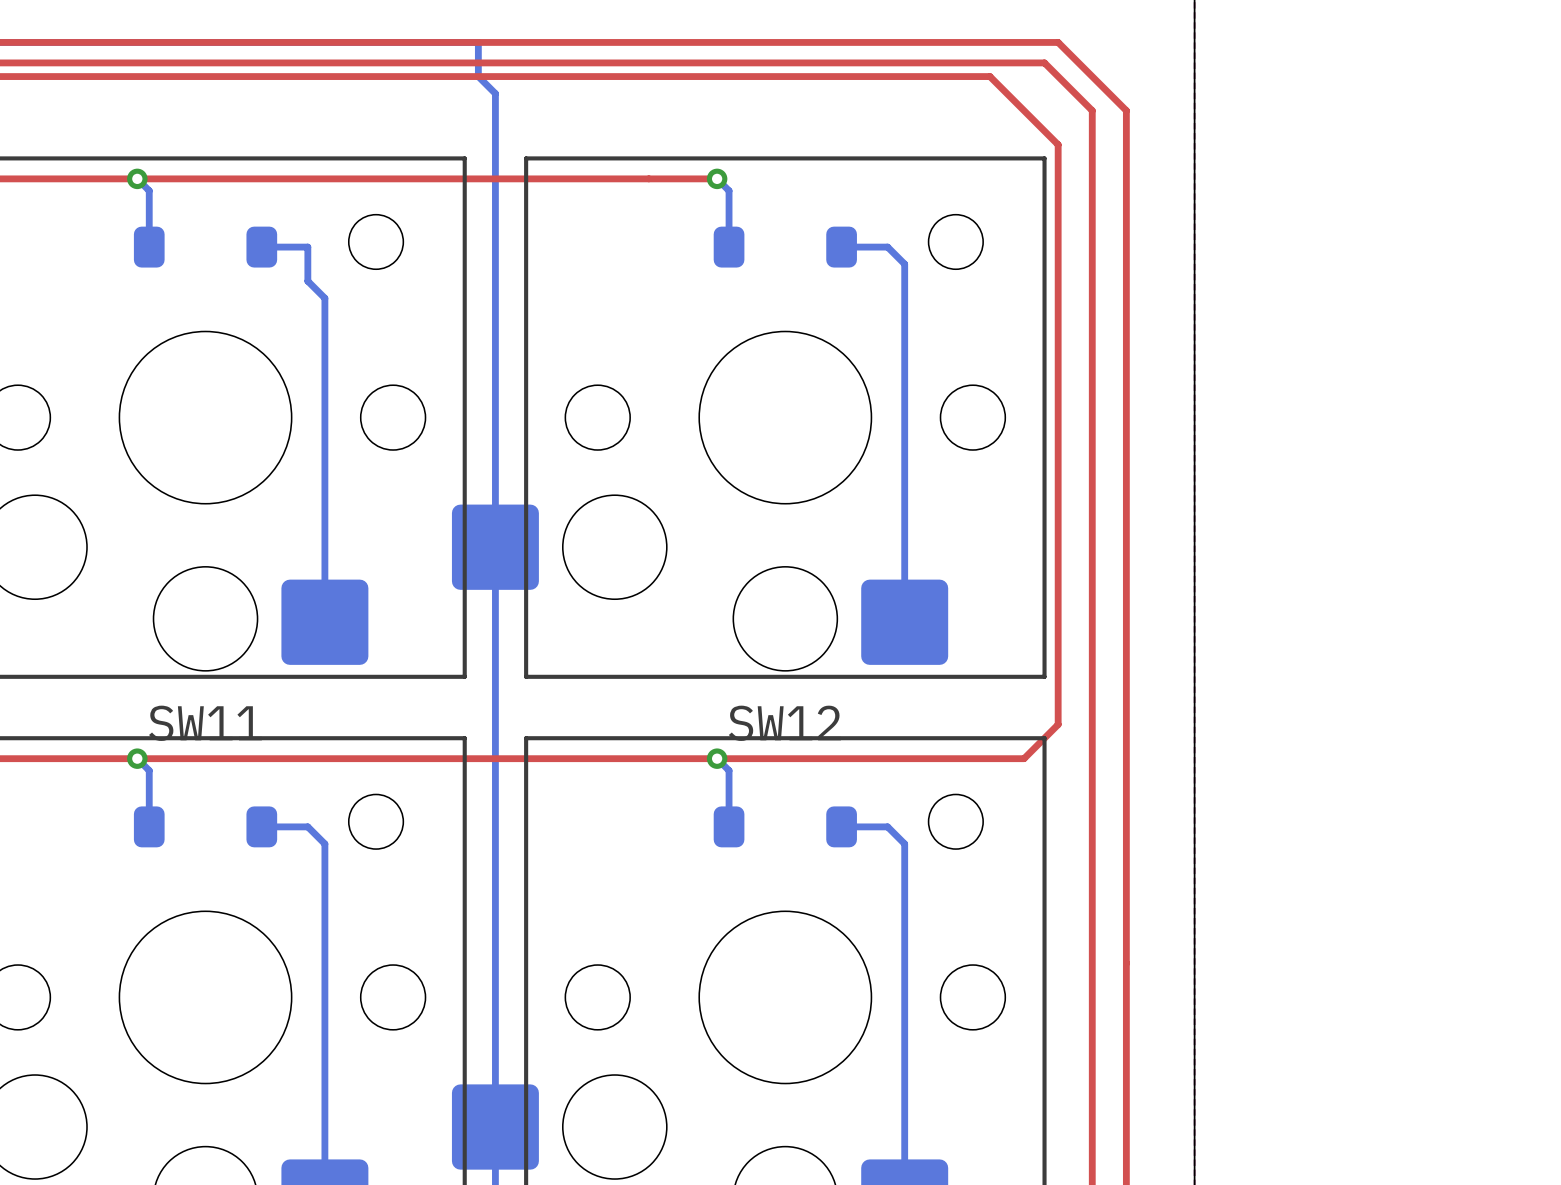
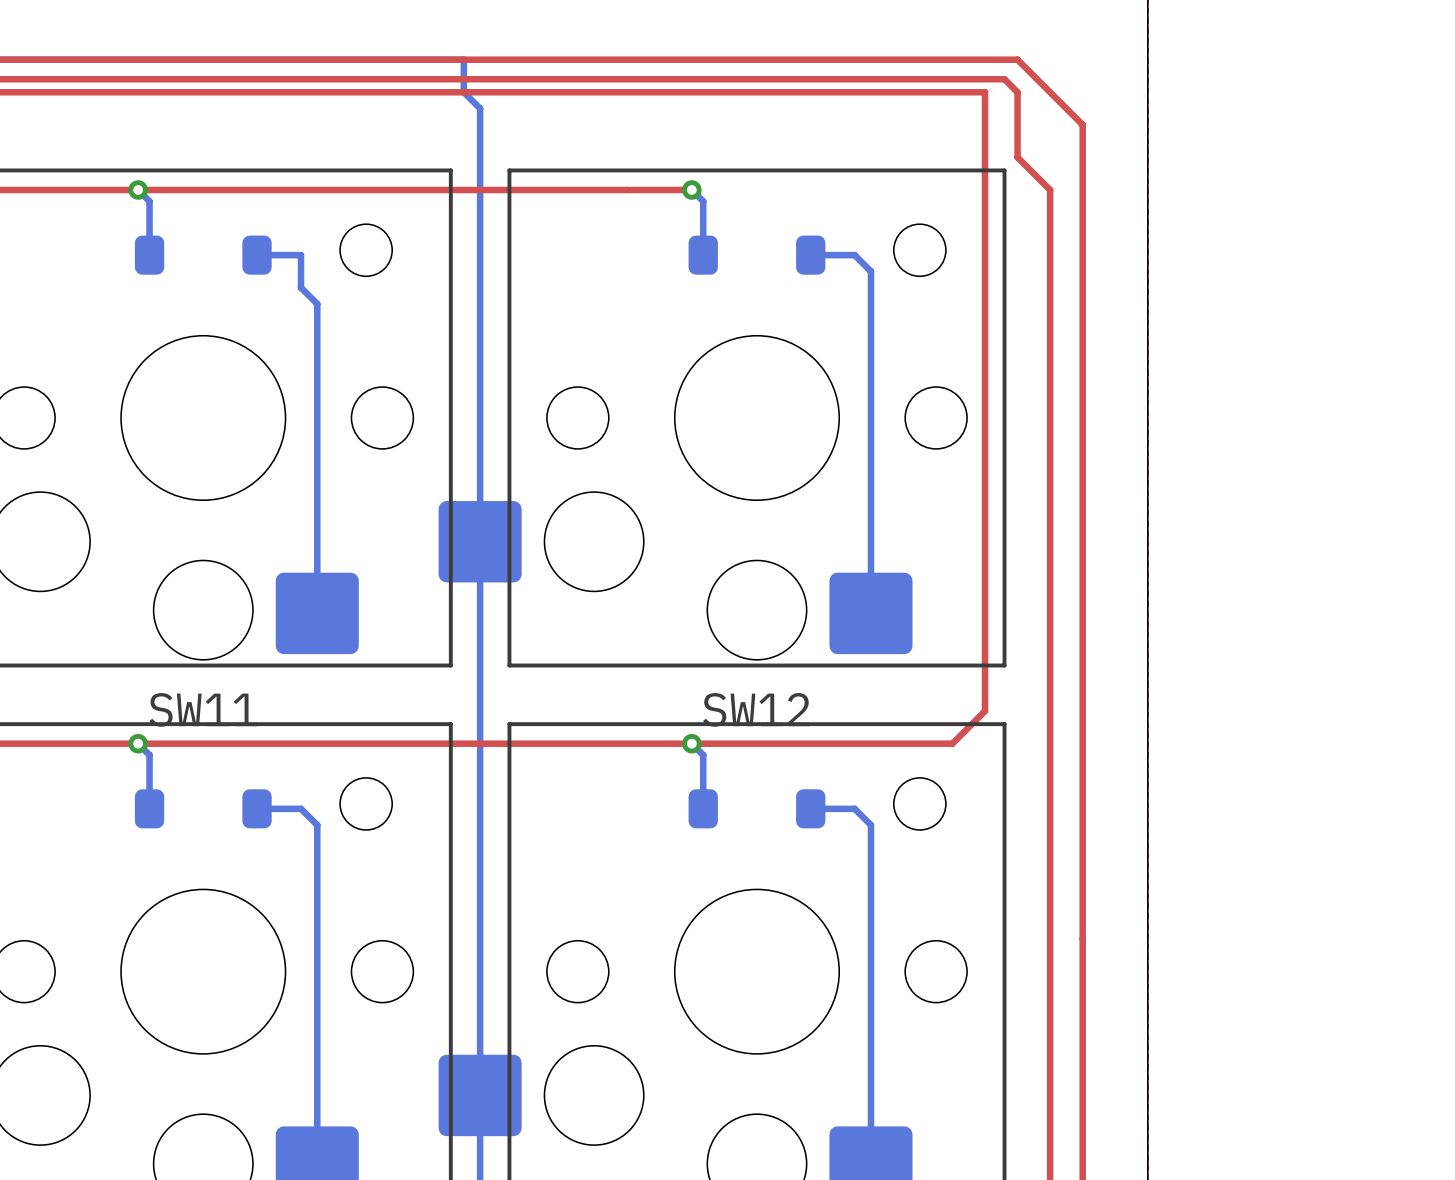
top track: (989, 76) (1058, 144) (1058, 724) (1024, 758) (989, 758) -> (952, 92) (984, 92) (984, 711) (952, 743)
top track: (1058, 76) (1092, 110) (1092, 178) -> (1017, 92) (1017, 157) (1050, 189)

